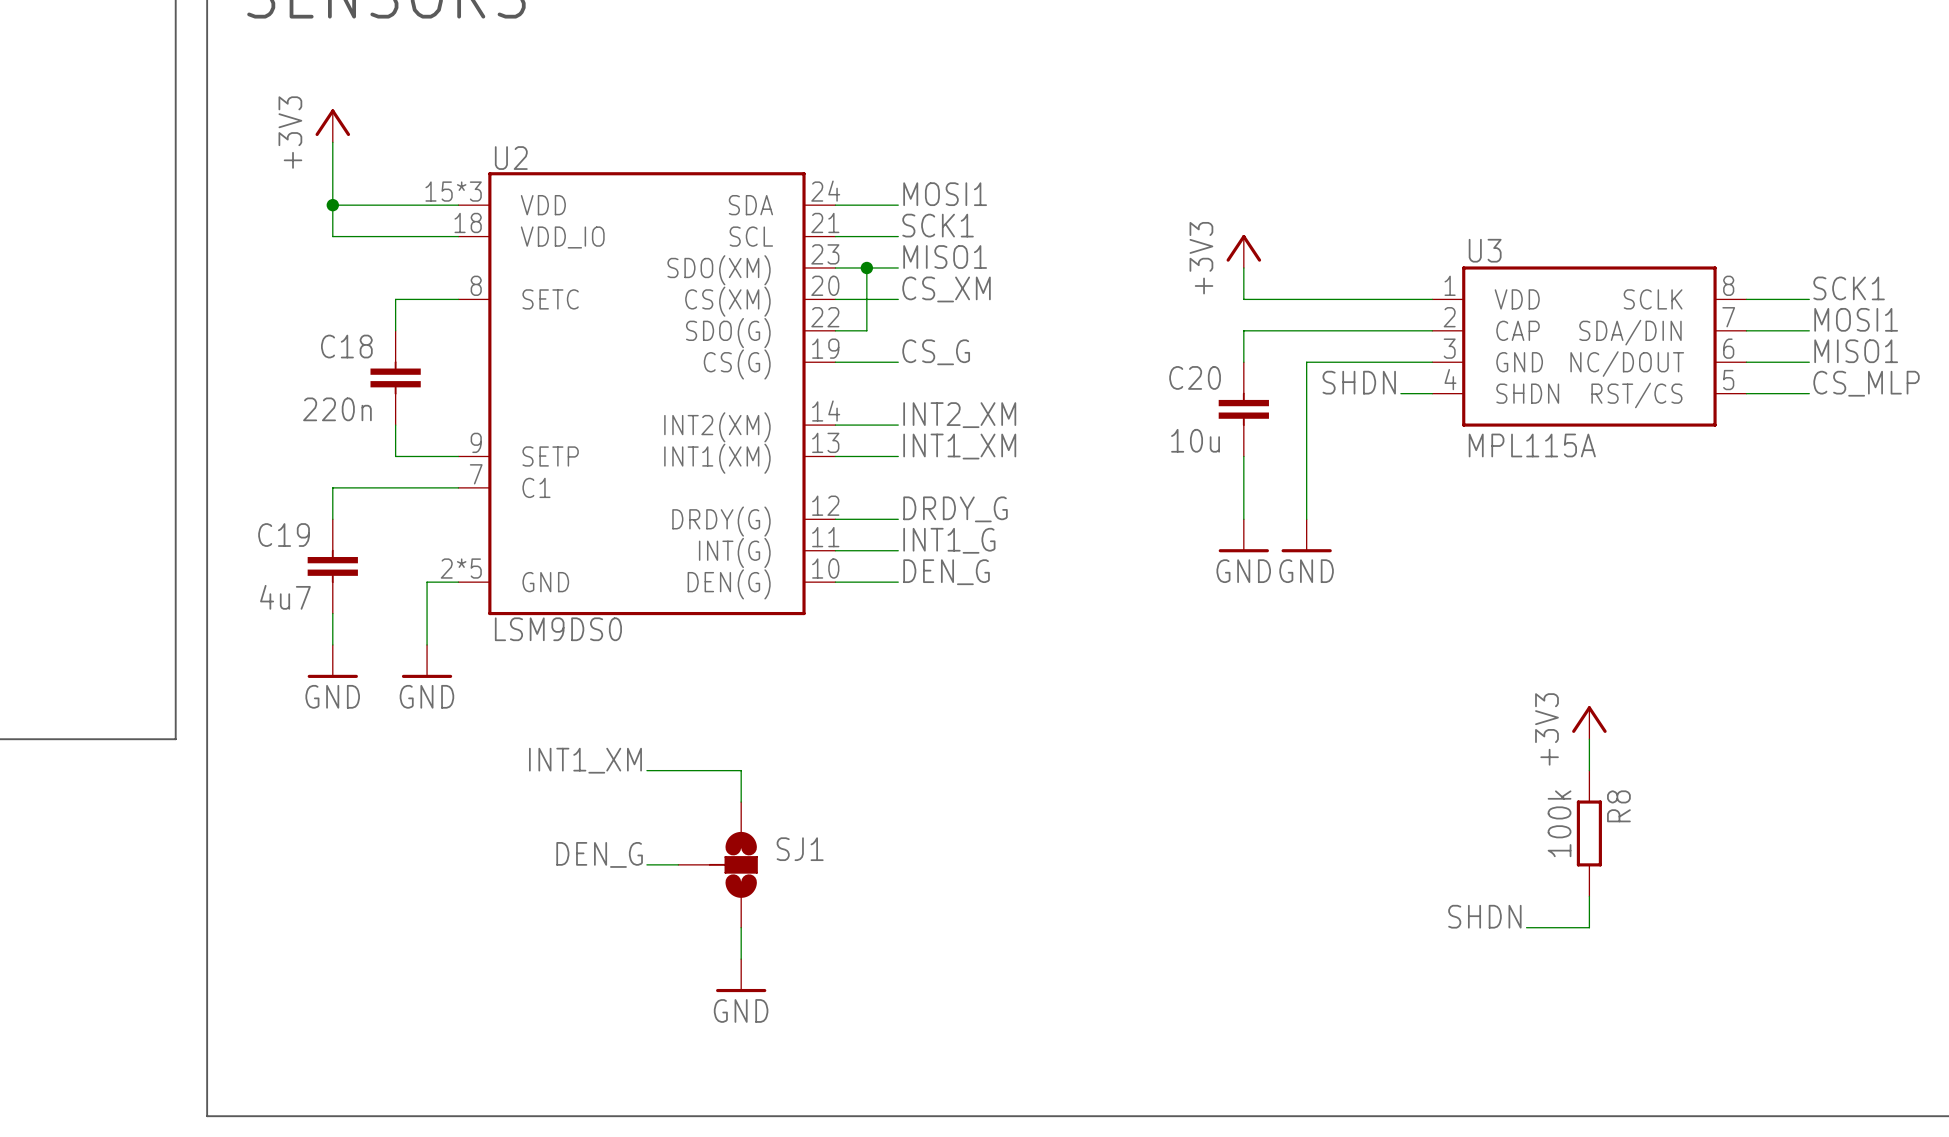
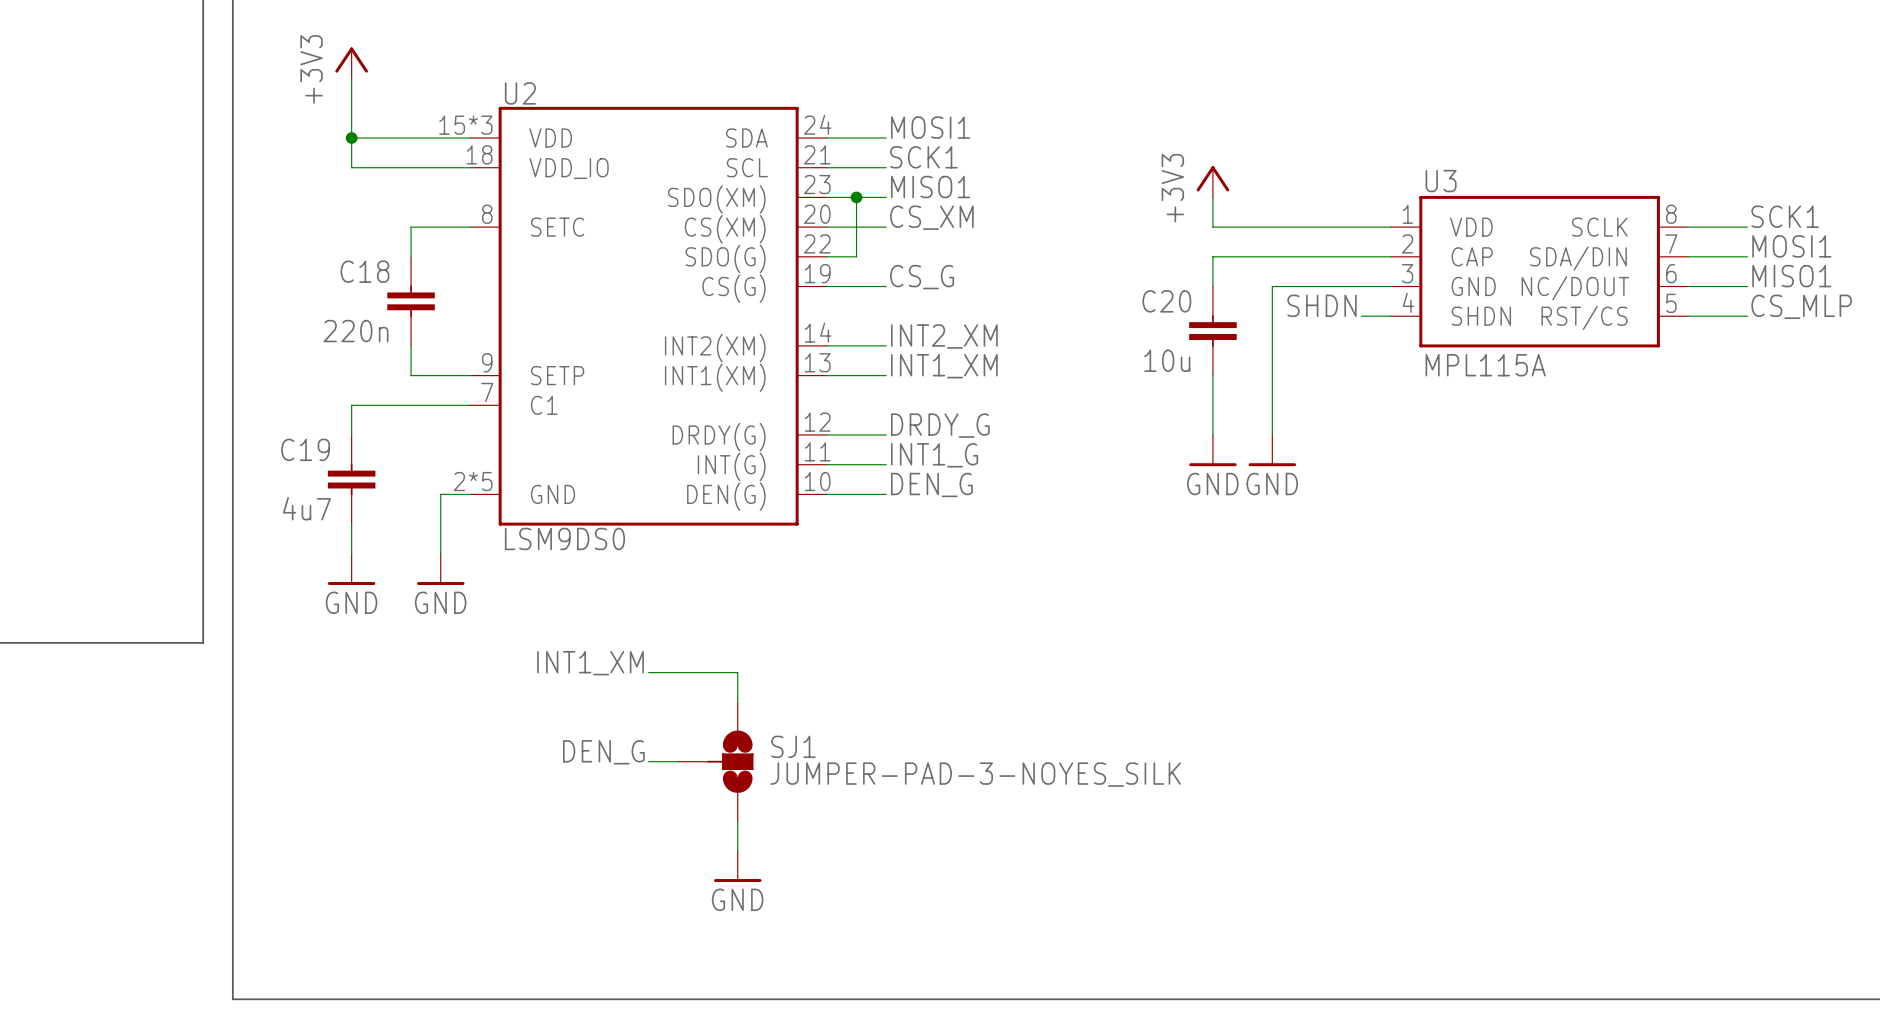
power symbol: +3V3 (1589, 722) -> none
wire: (1589, 739) (1589, 770) -> none
R8: 100k (1589, 833) -> none
SJ1 value: none -> JUMPER-PAD-3-NOYES_SILK (975, 774)
wire: (1589, 896) (1589, 927) (1526, 927) -> none
label: SHDN (1484, 916) -> none

